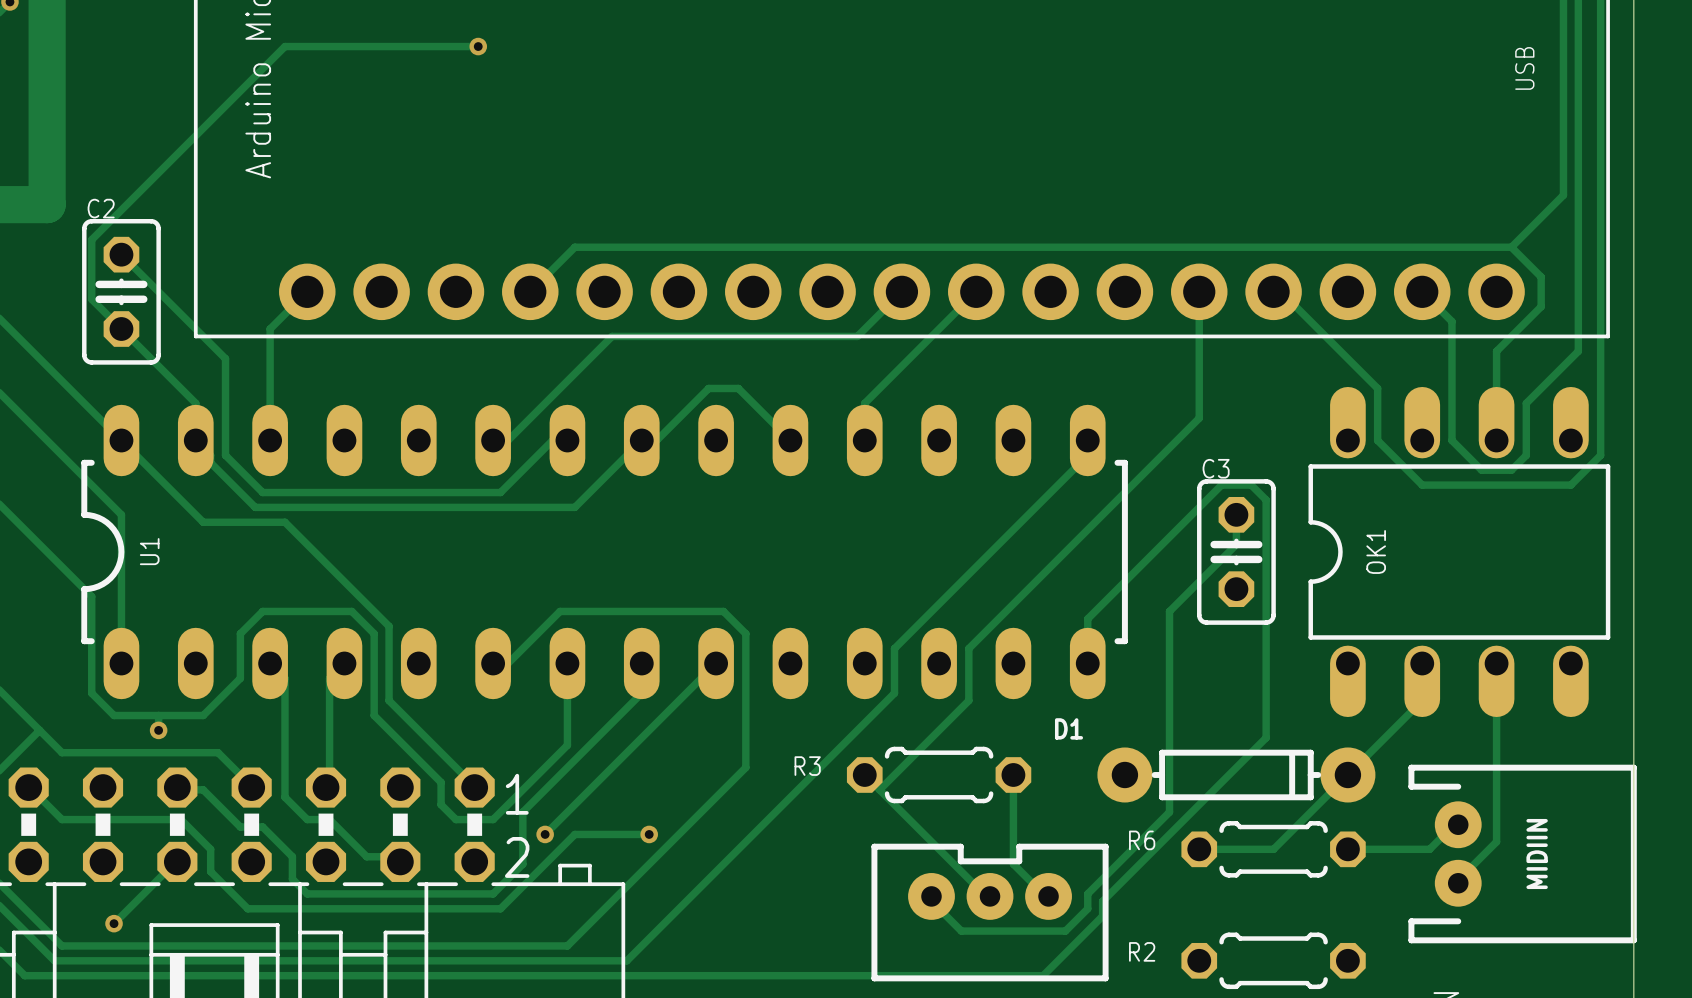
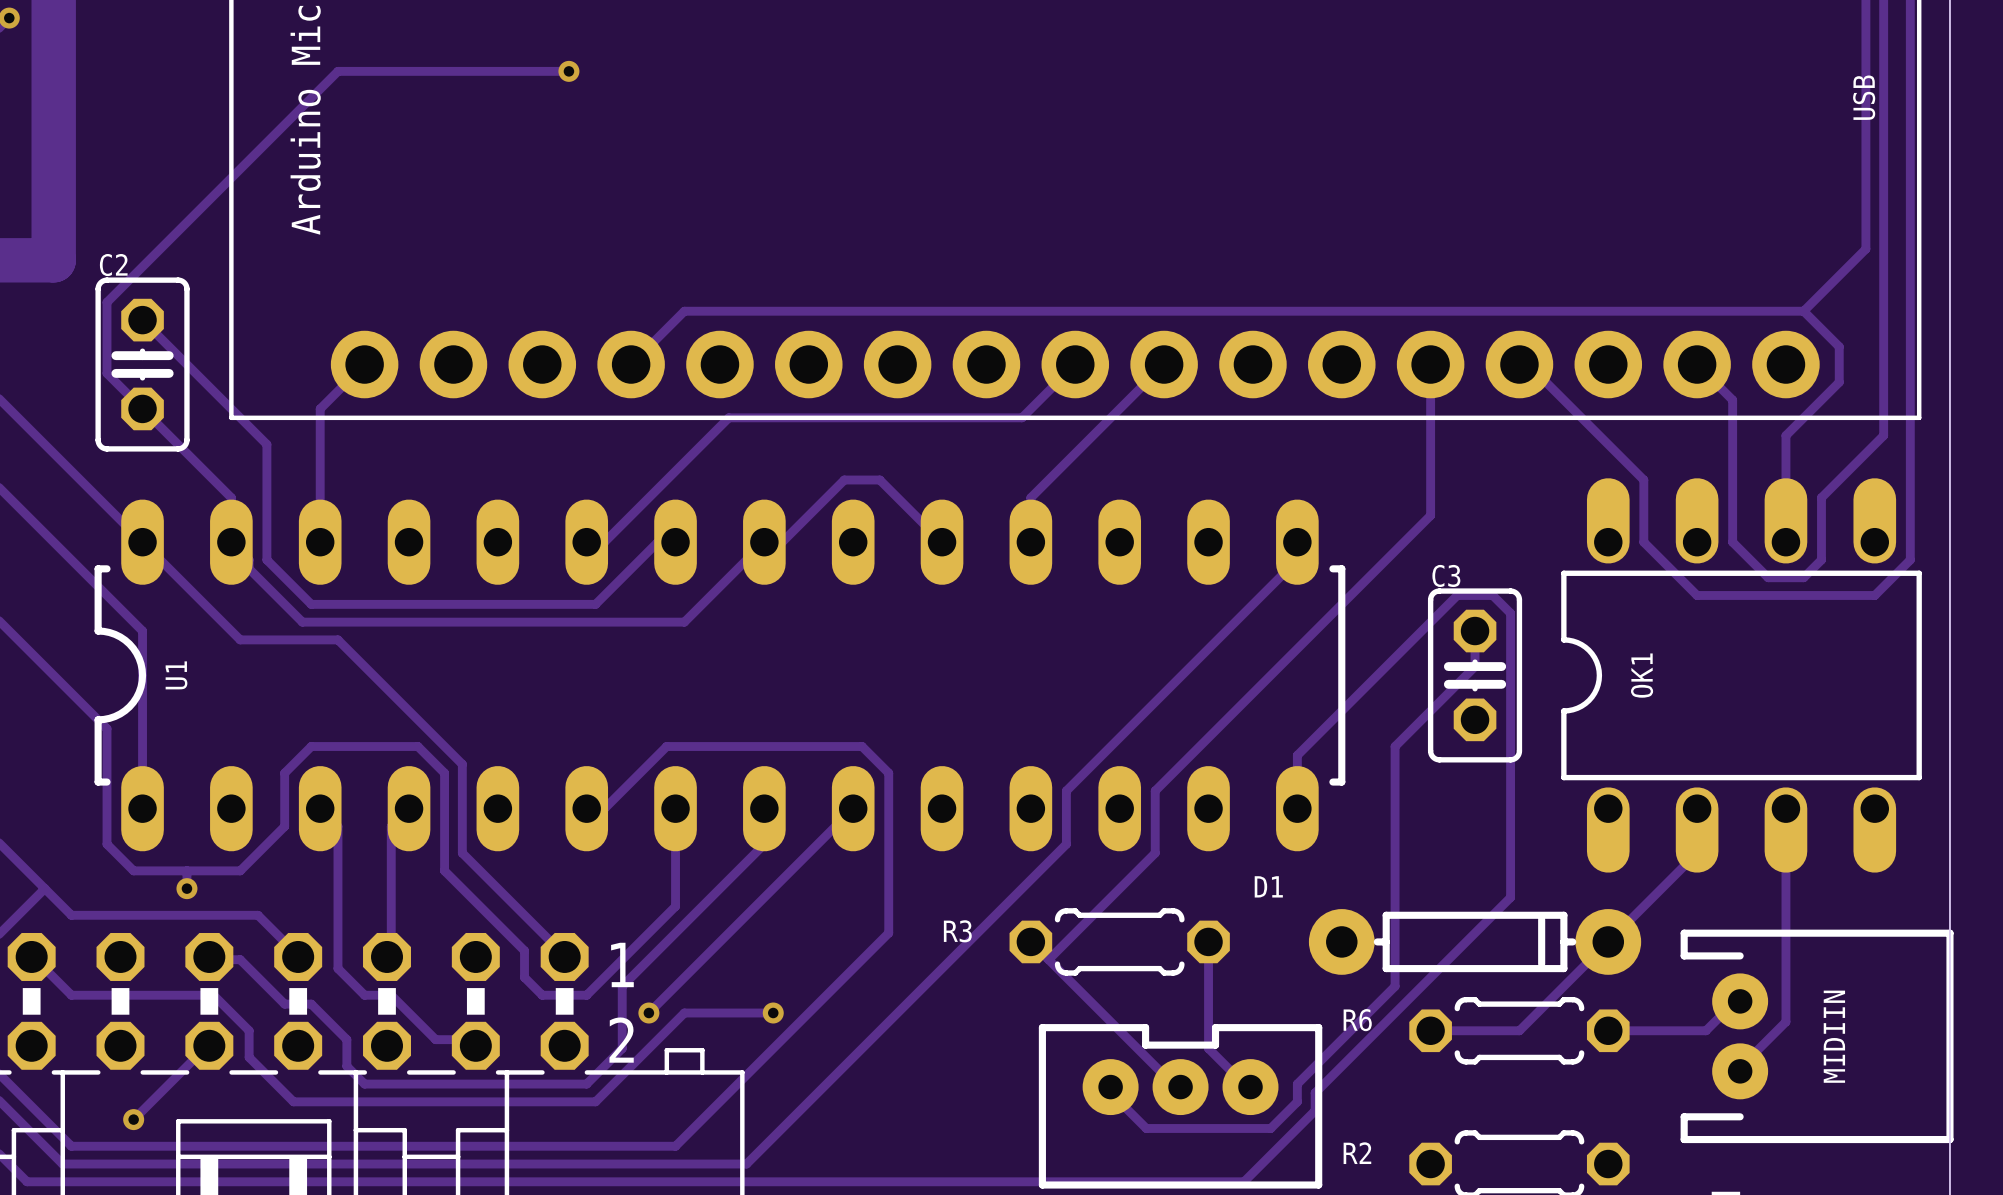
text position: USB (1524, 68) -> USB (1864, 97)

